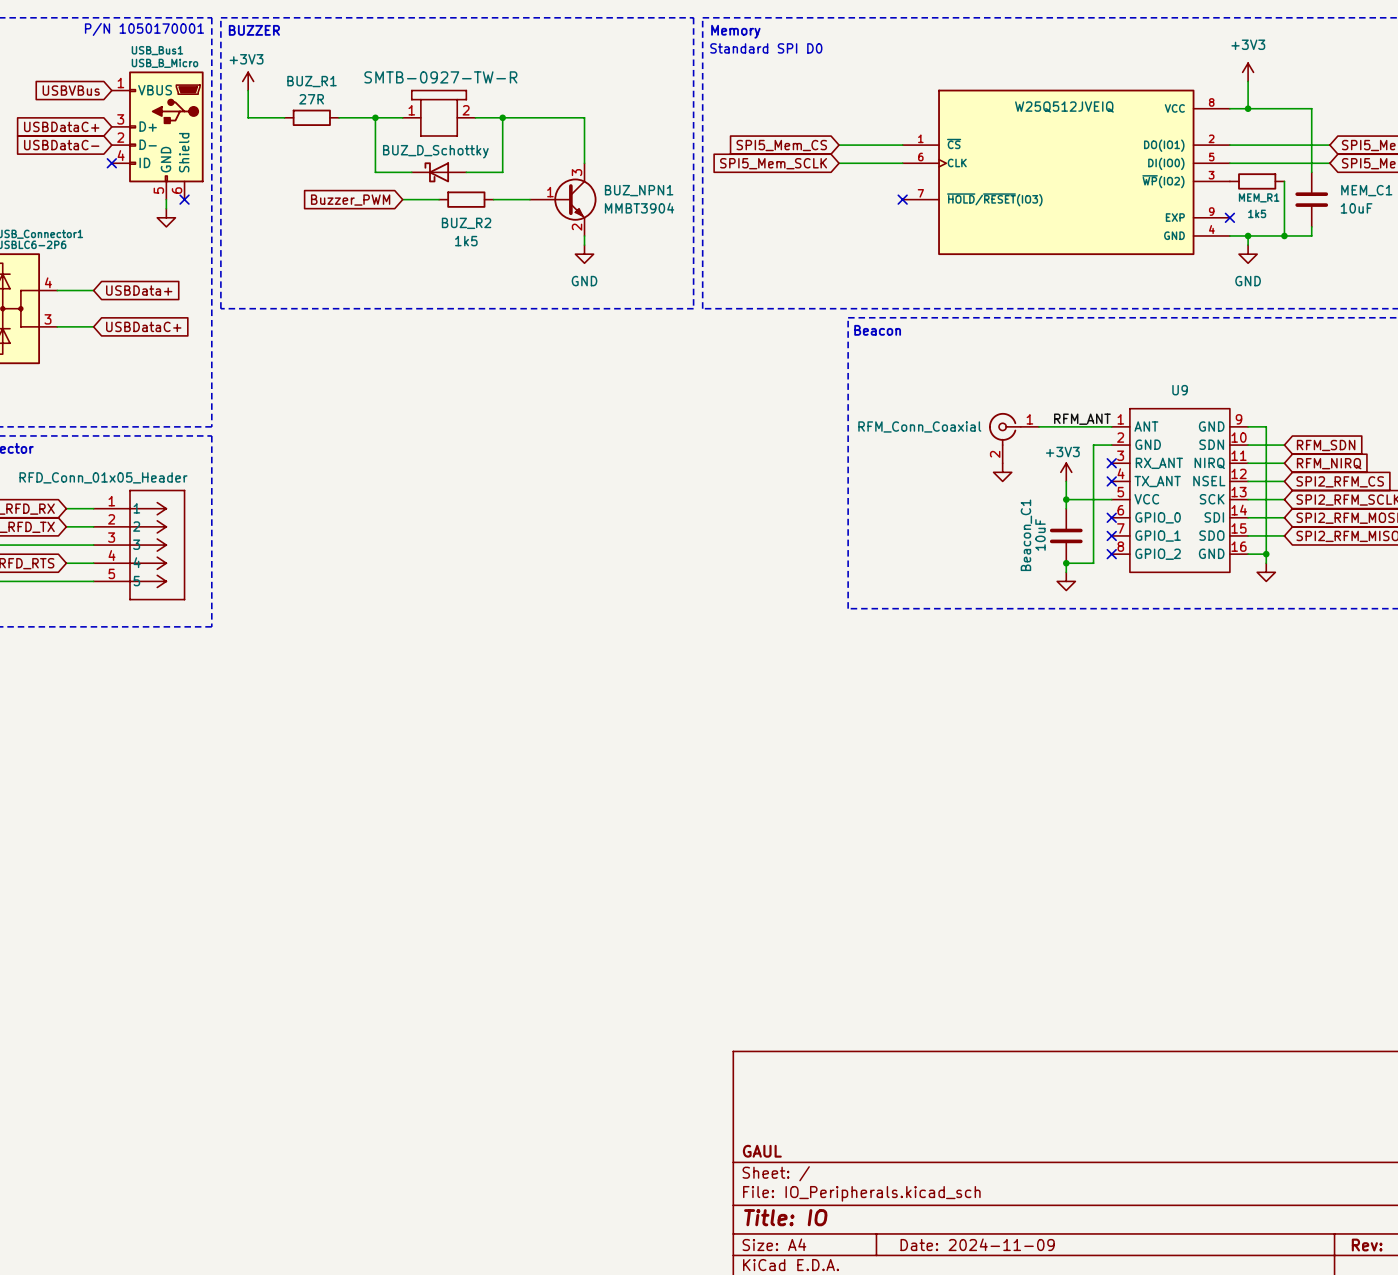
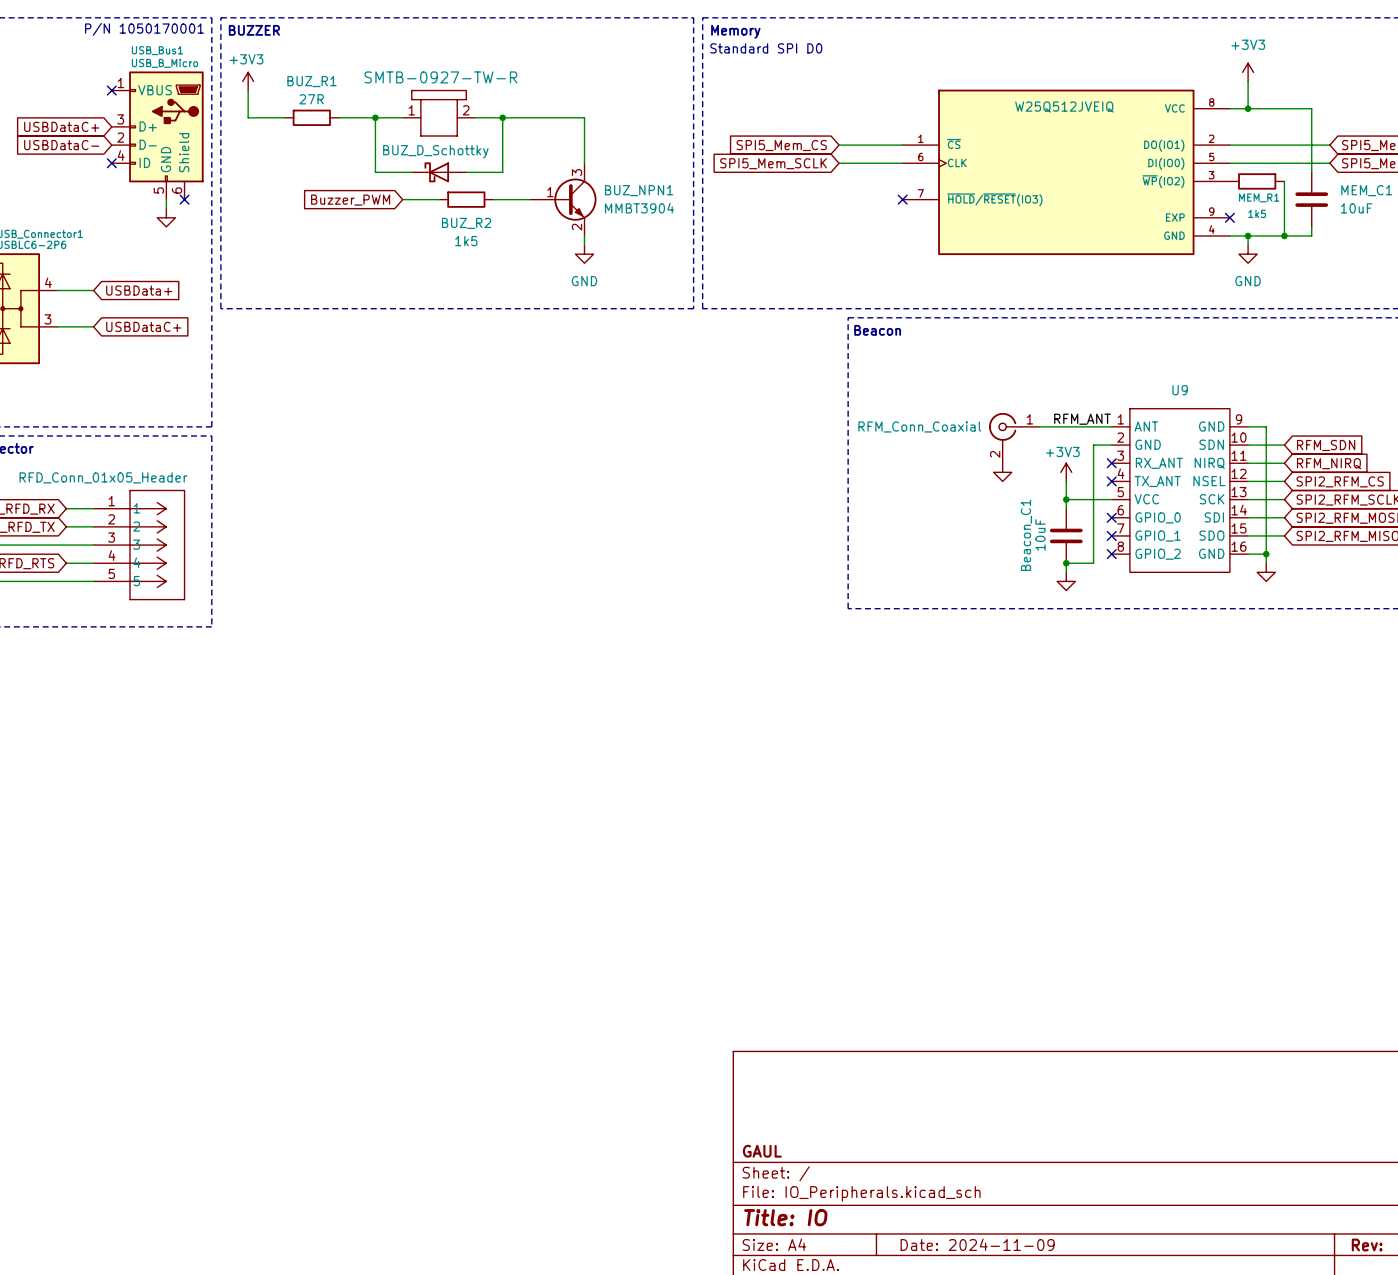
global label: USBVBus (71, 90) -> none
no-connect mark: none -> (111, 90)

